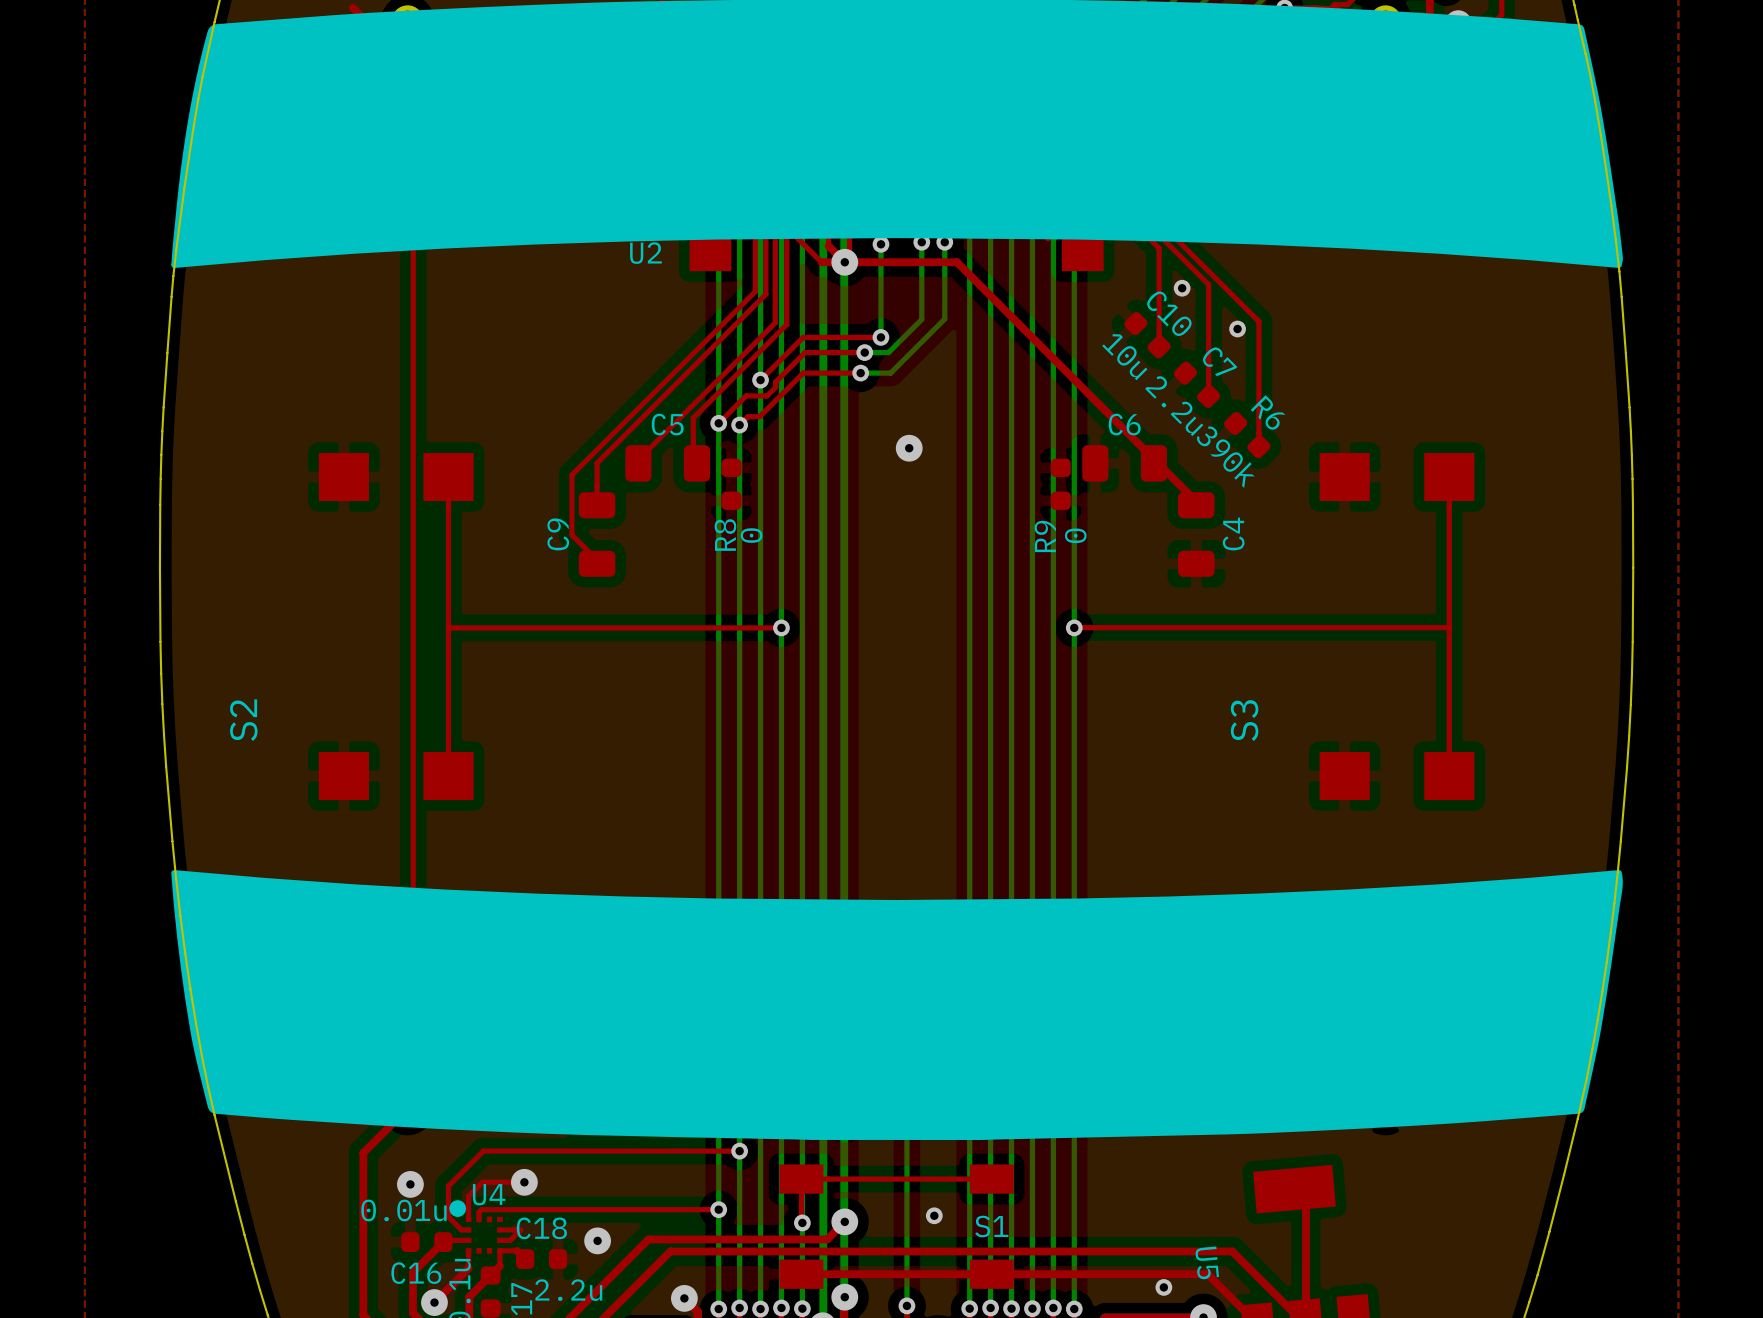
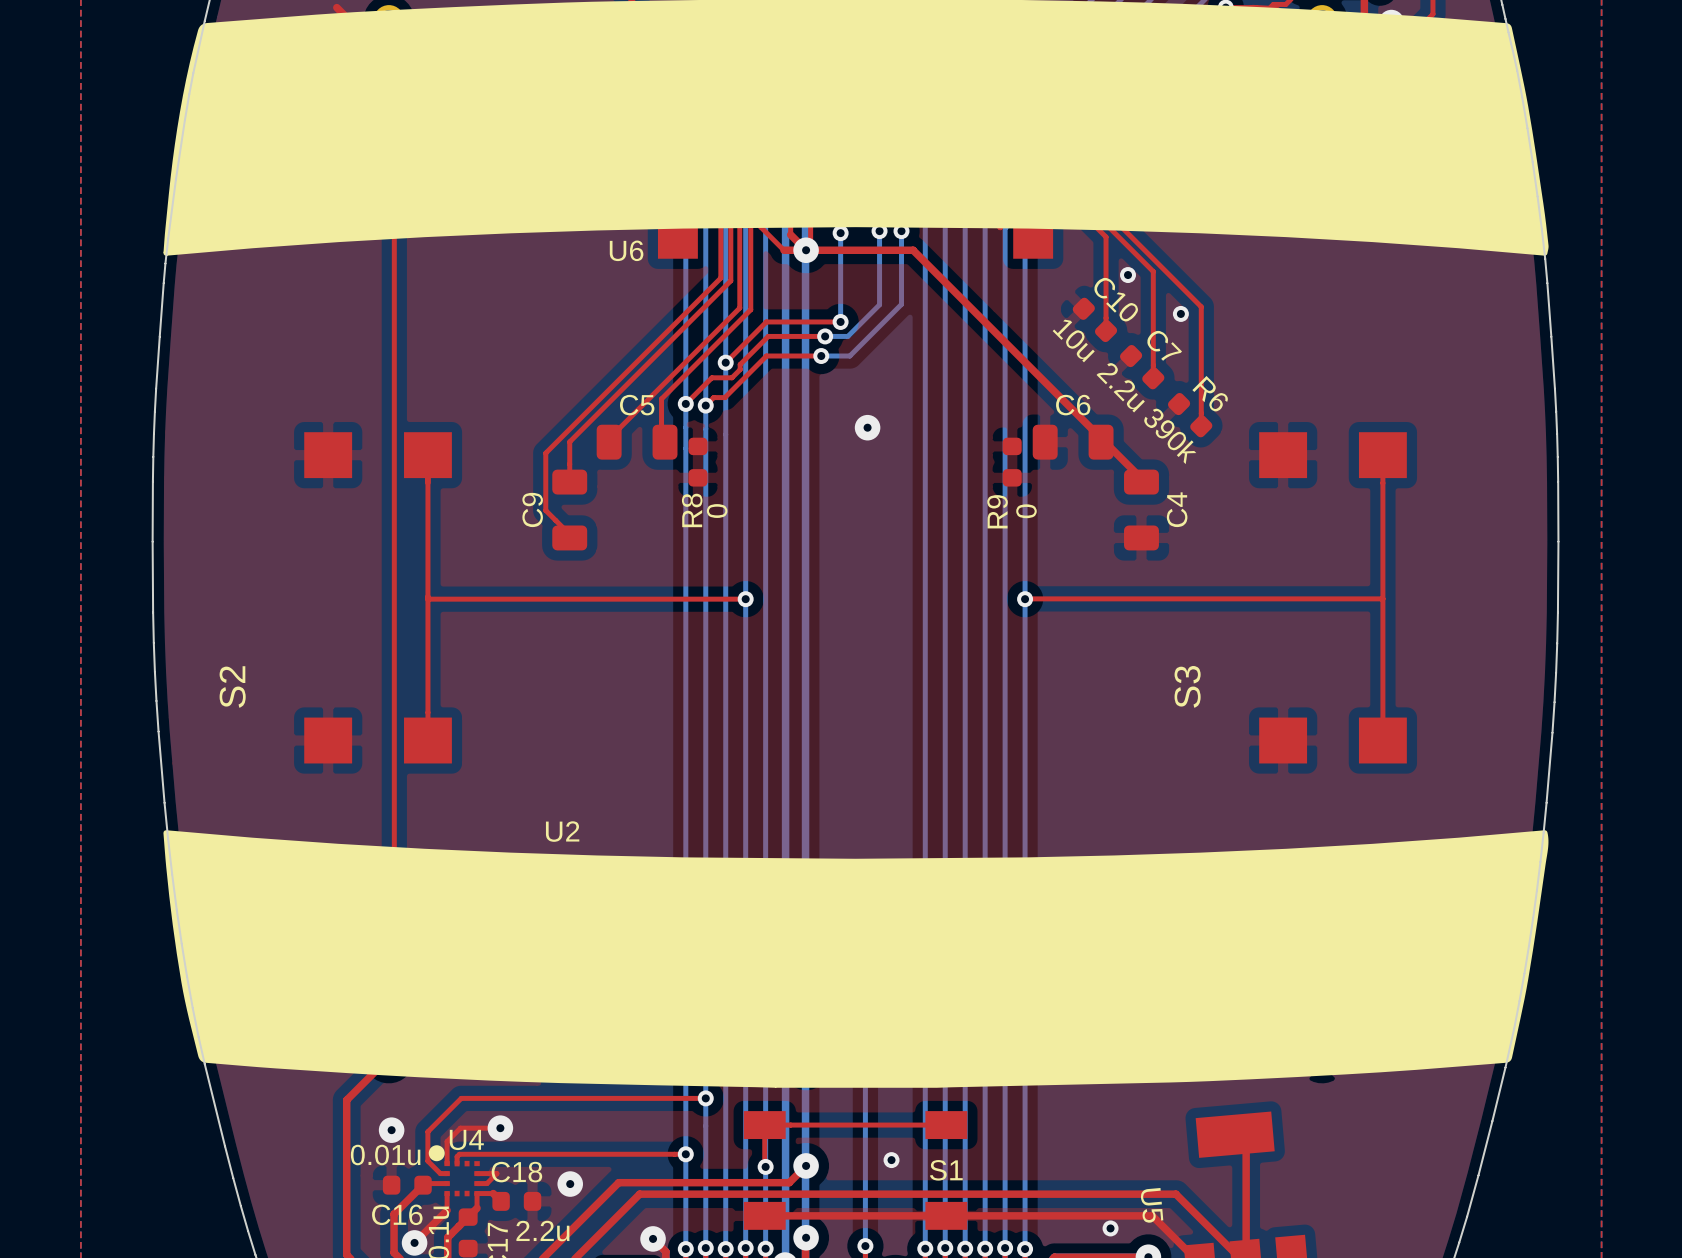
U2 name: U2 (645, 253) -> U6 (626, 250)
U2: none -> (562, 831)

